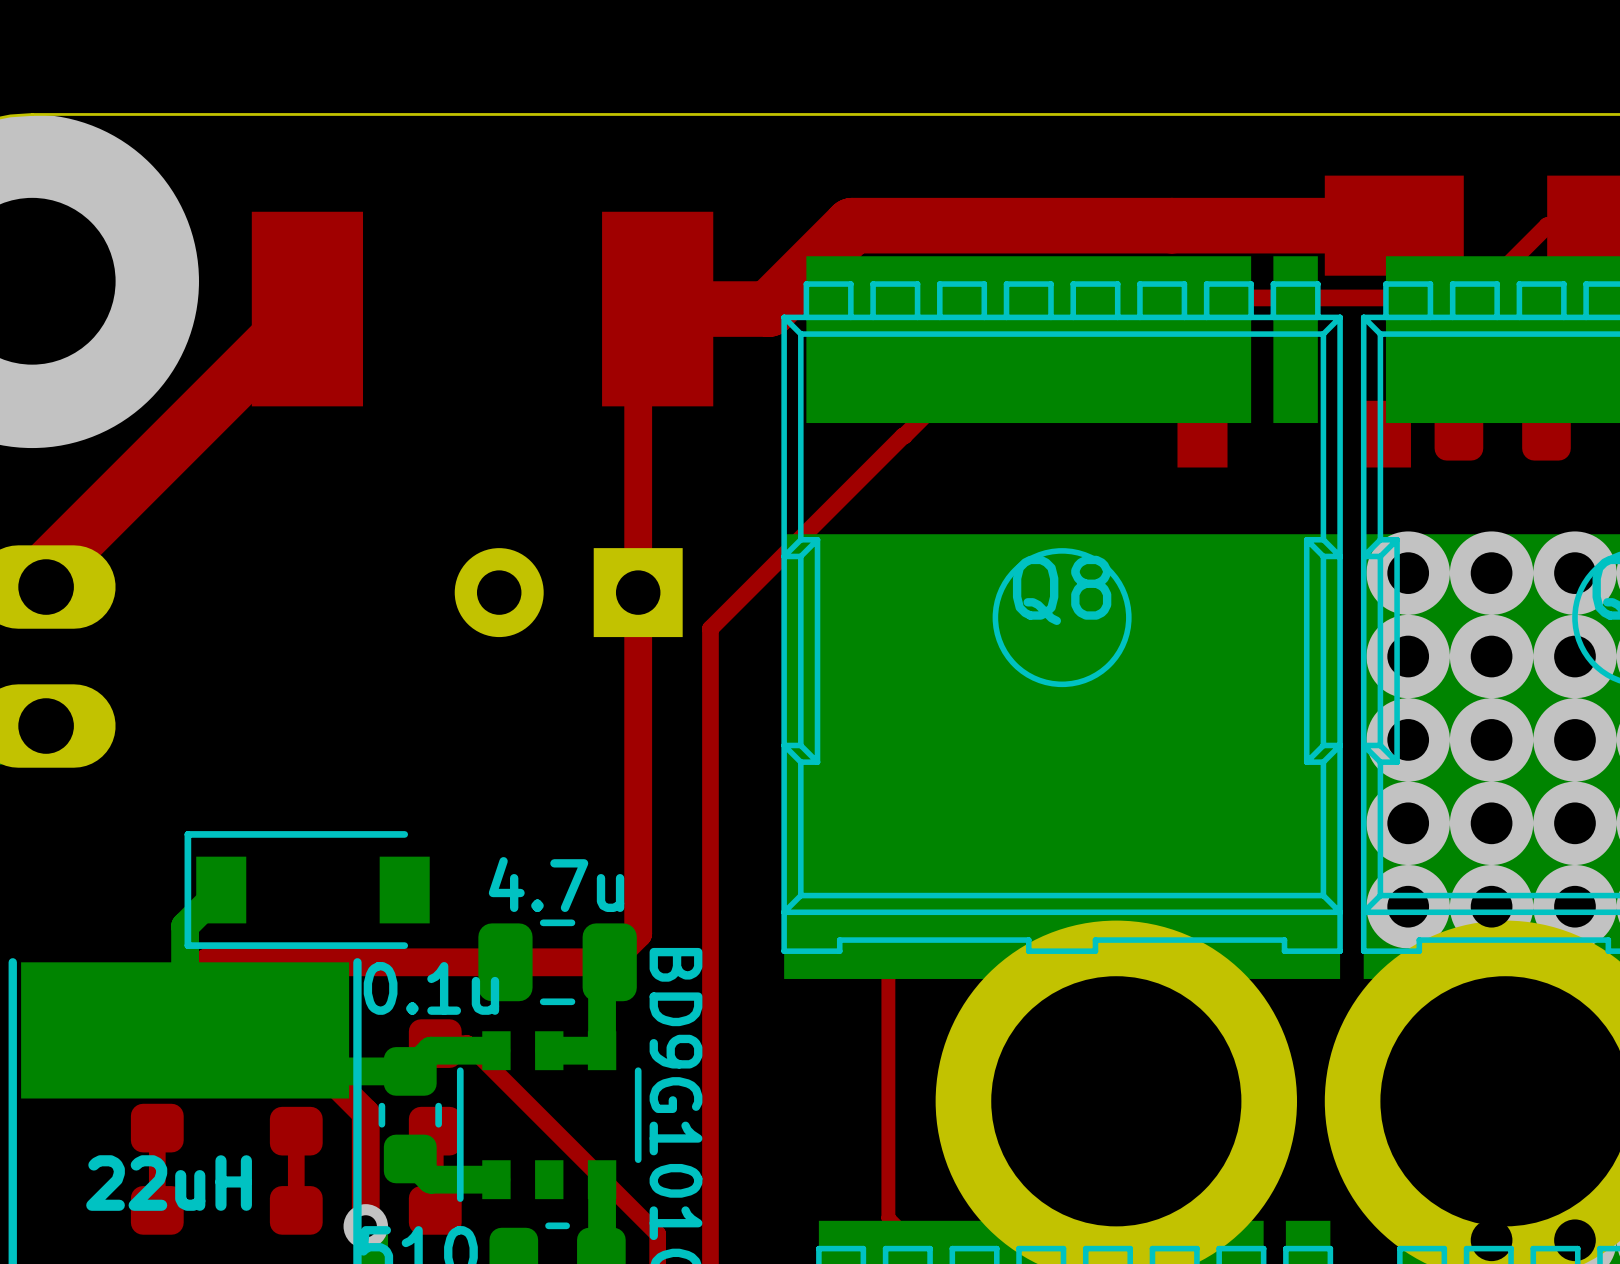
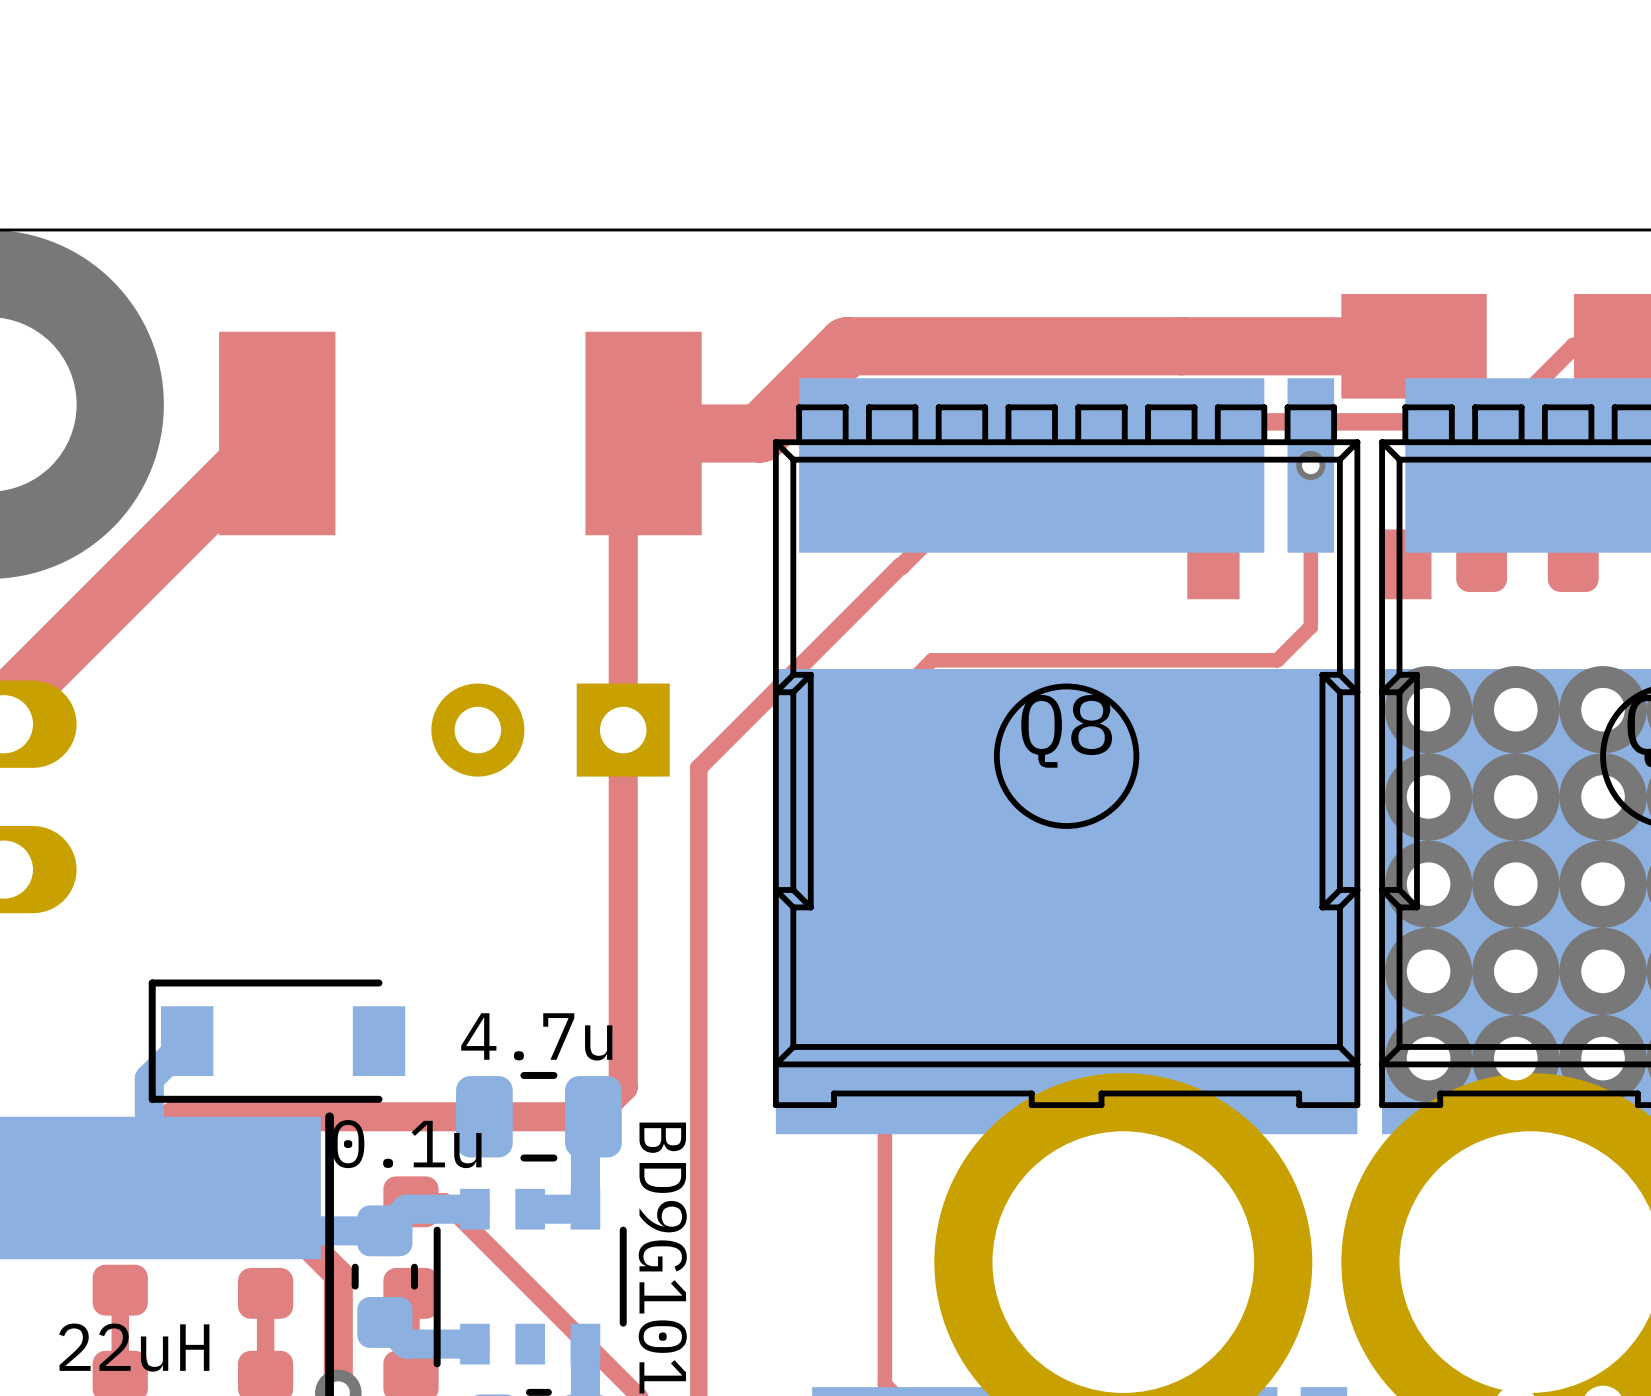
top track: none -> (1310, 465) (1310, 626) (1277, 660) (932, 660) (884, 707)
via: none -> (1310, 465)

